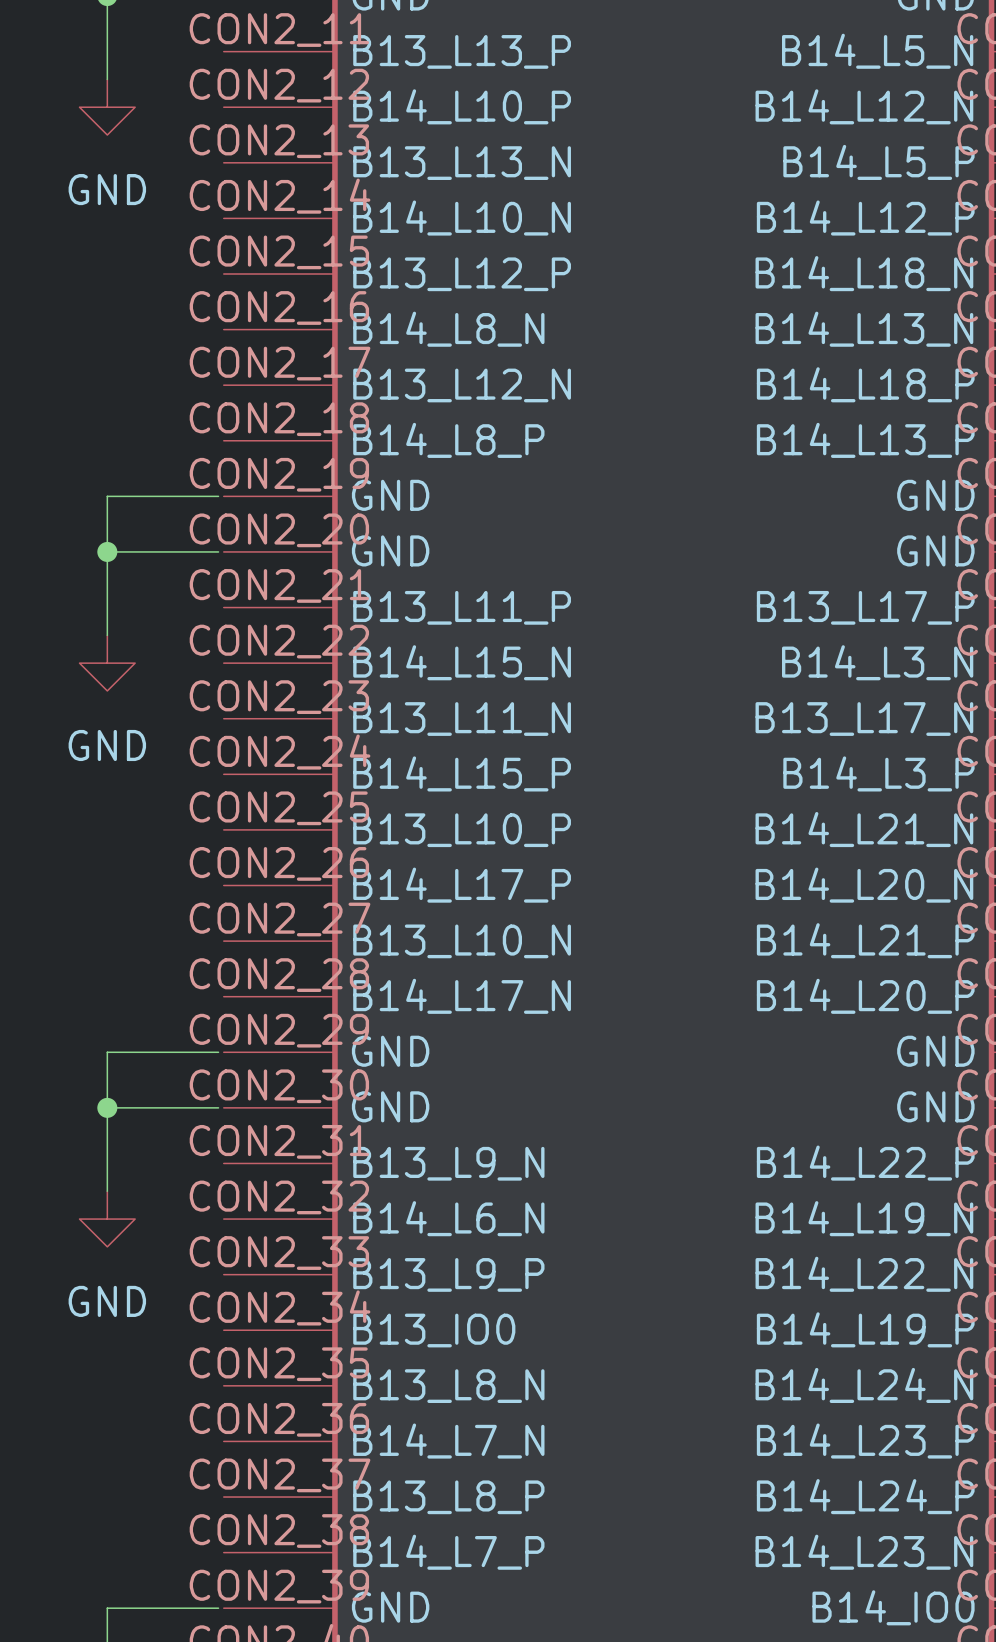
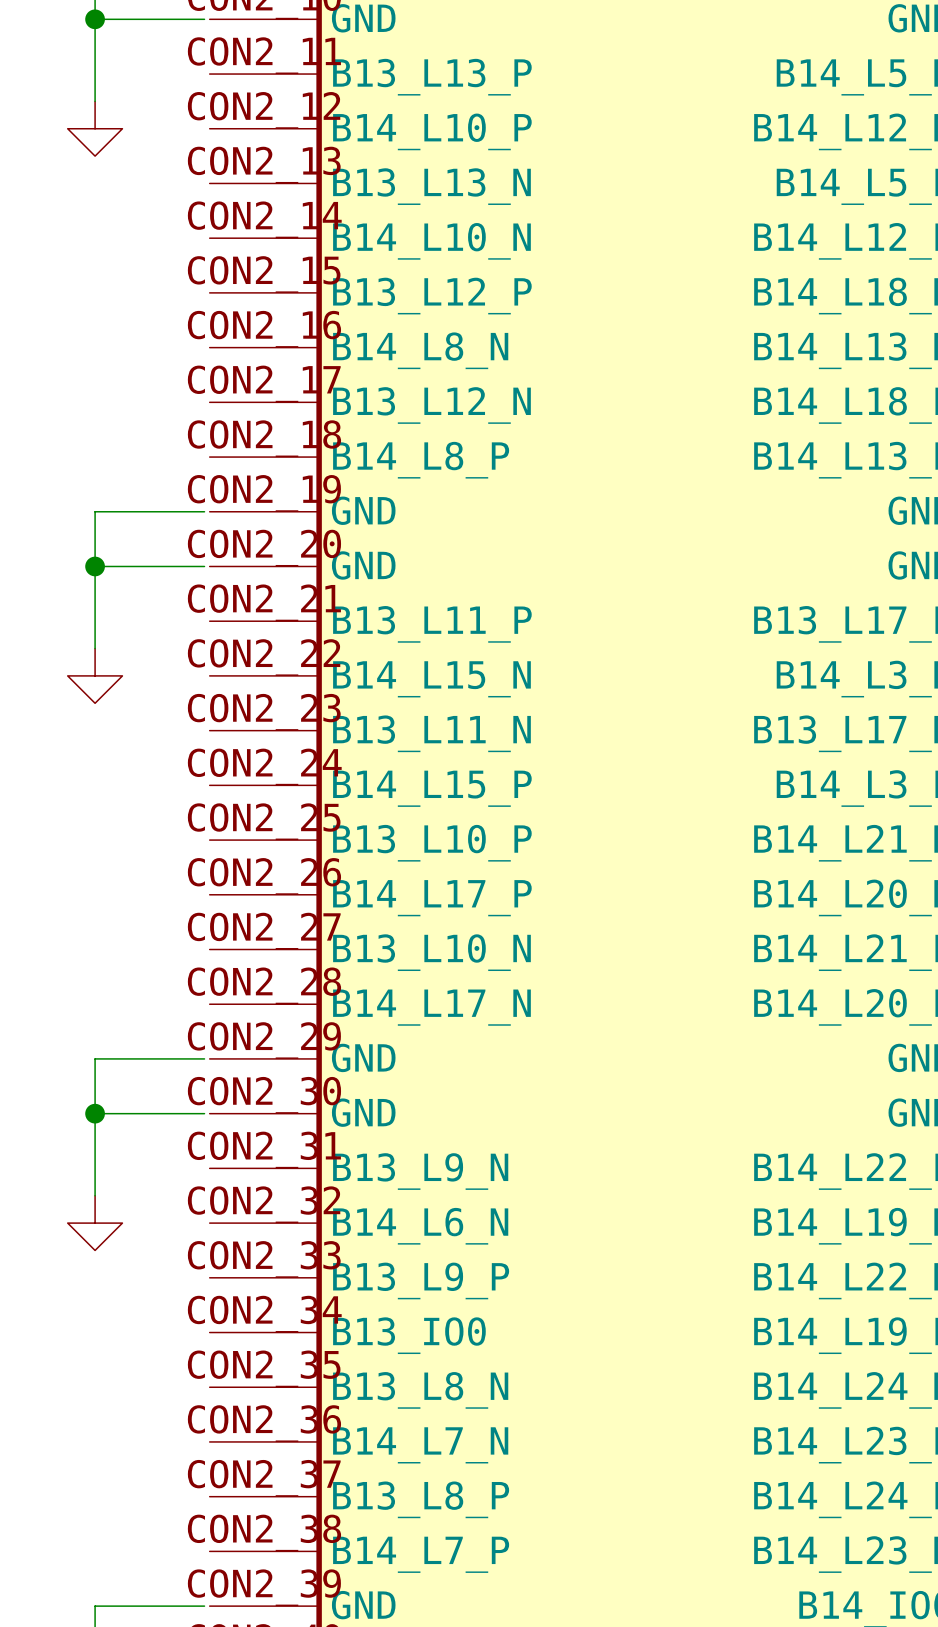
power symbol text: GND (107, 189) -> none
power symbol text: GND (107, 745) -> none
power symbol text: GND (107, 1301) -> none

